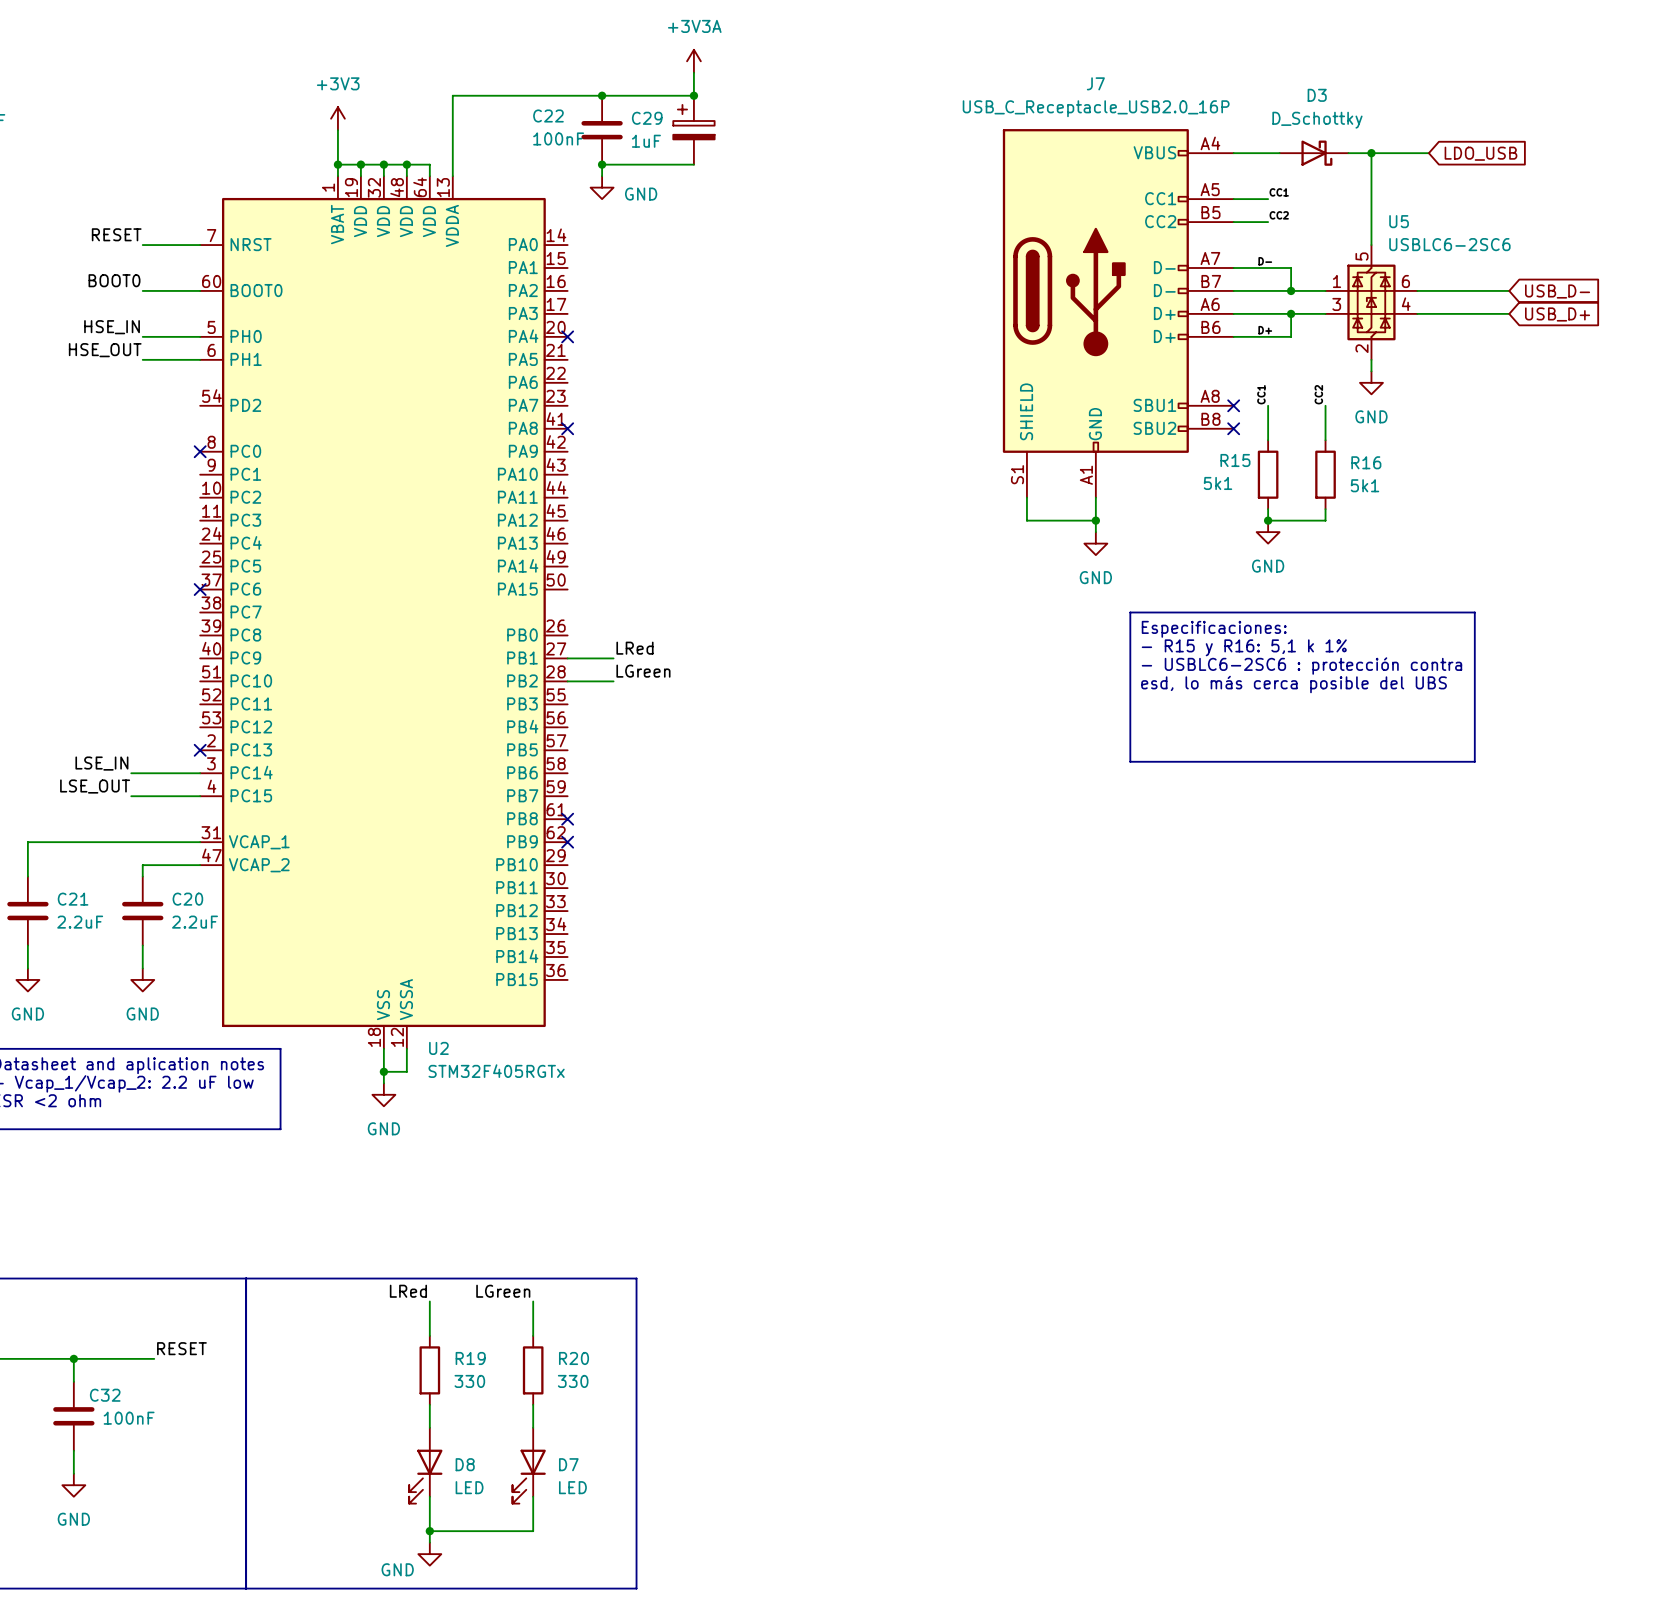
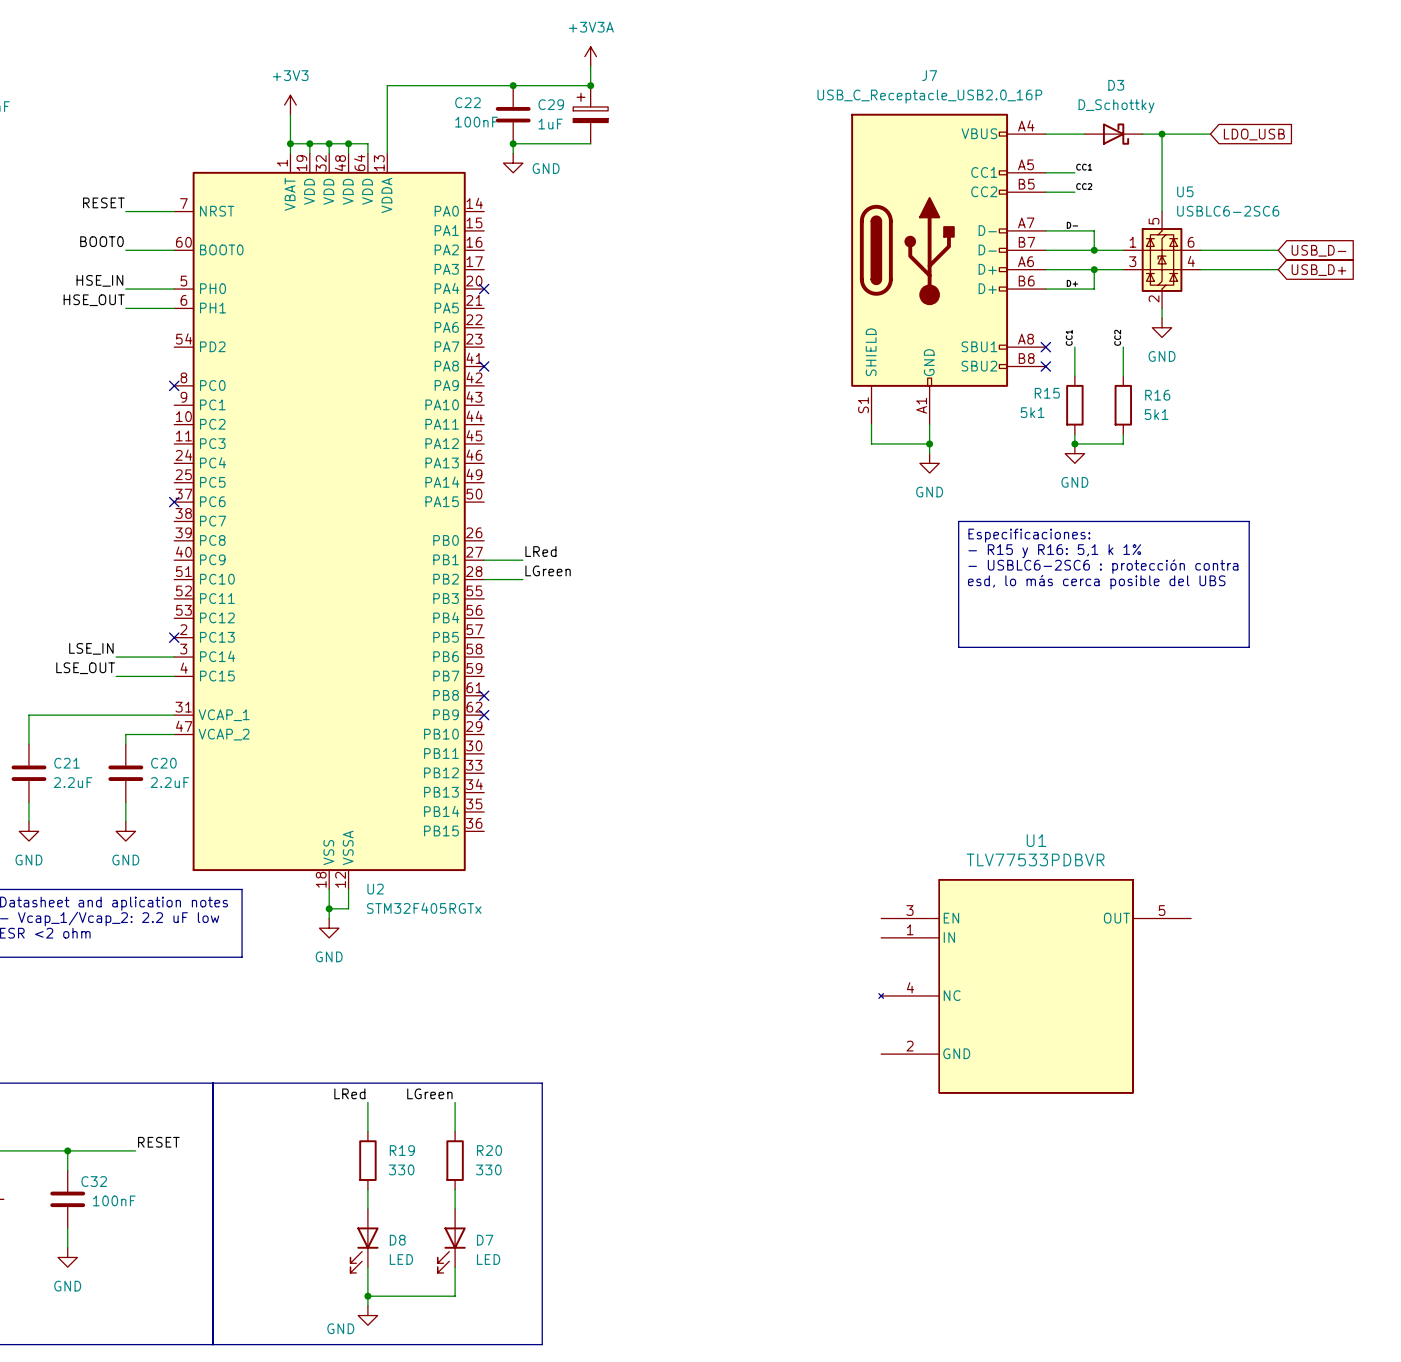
U1: none -> TLV77533PDBVR (1034, 986)

